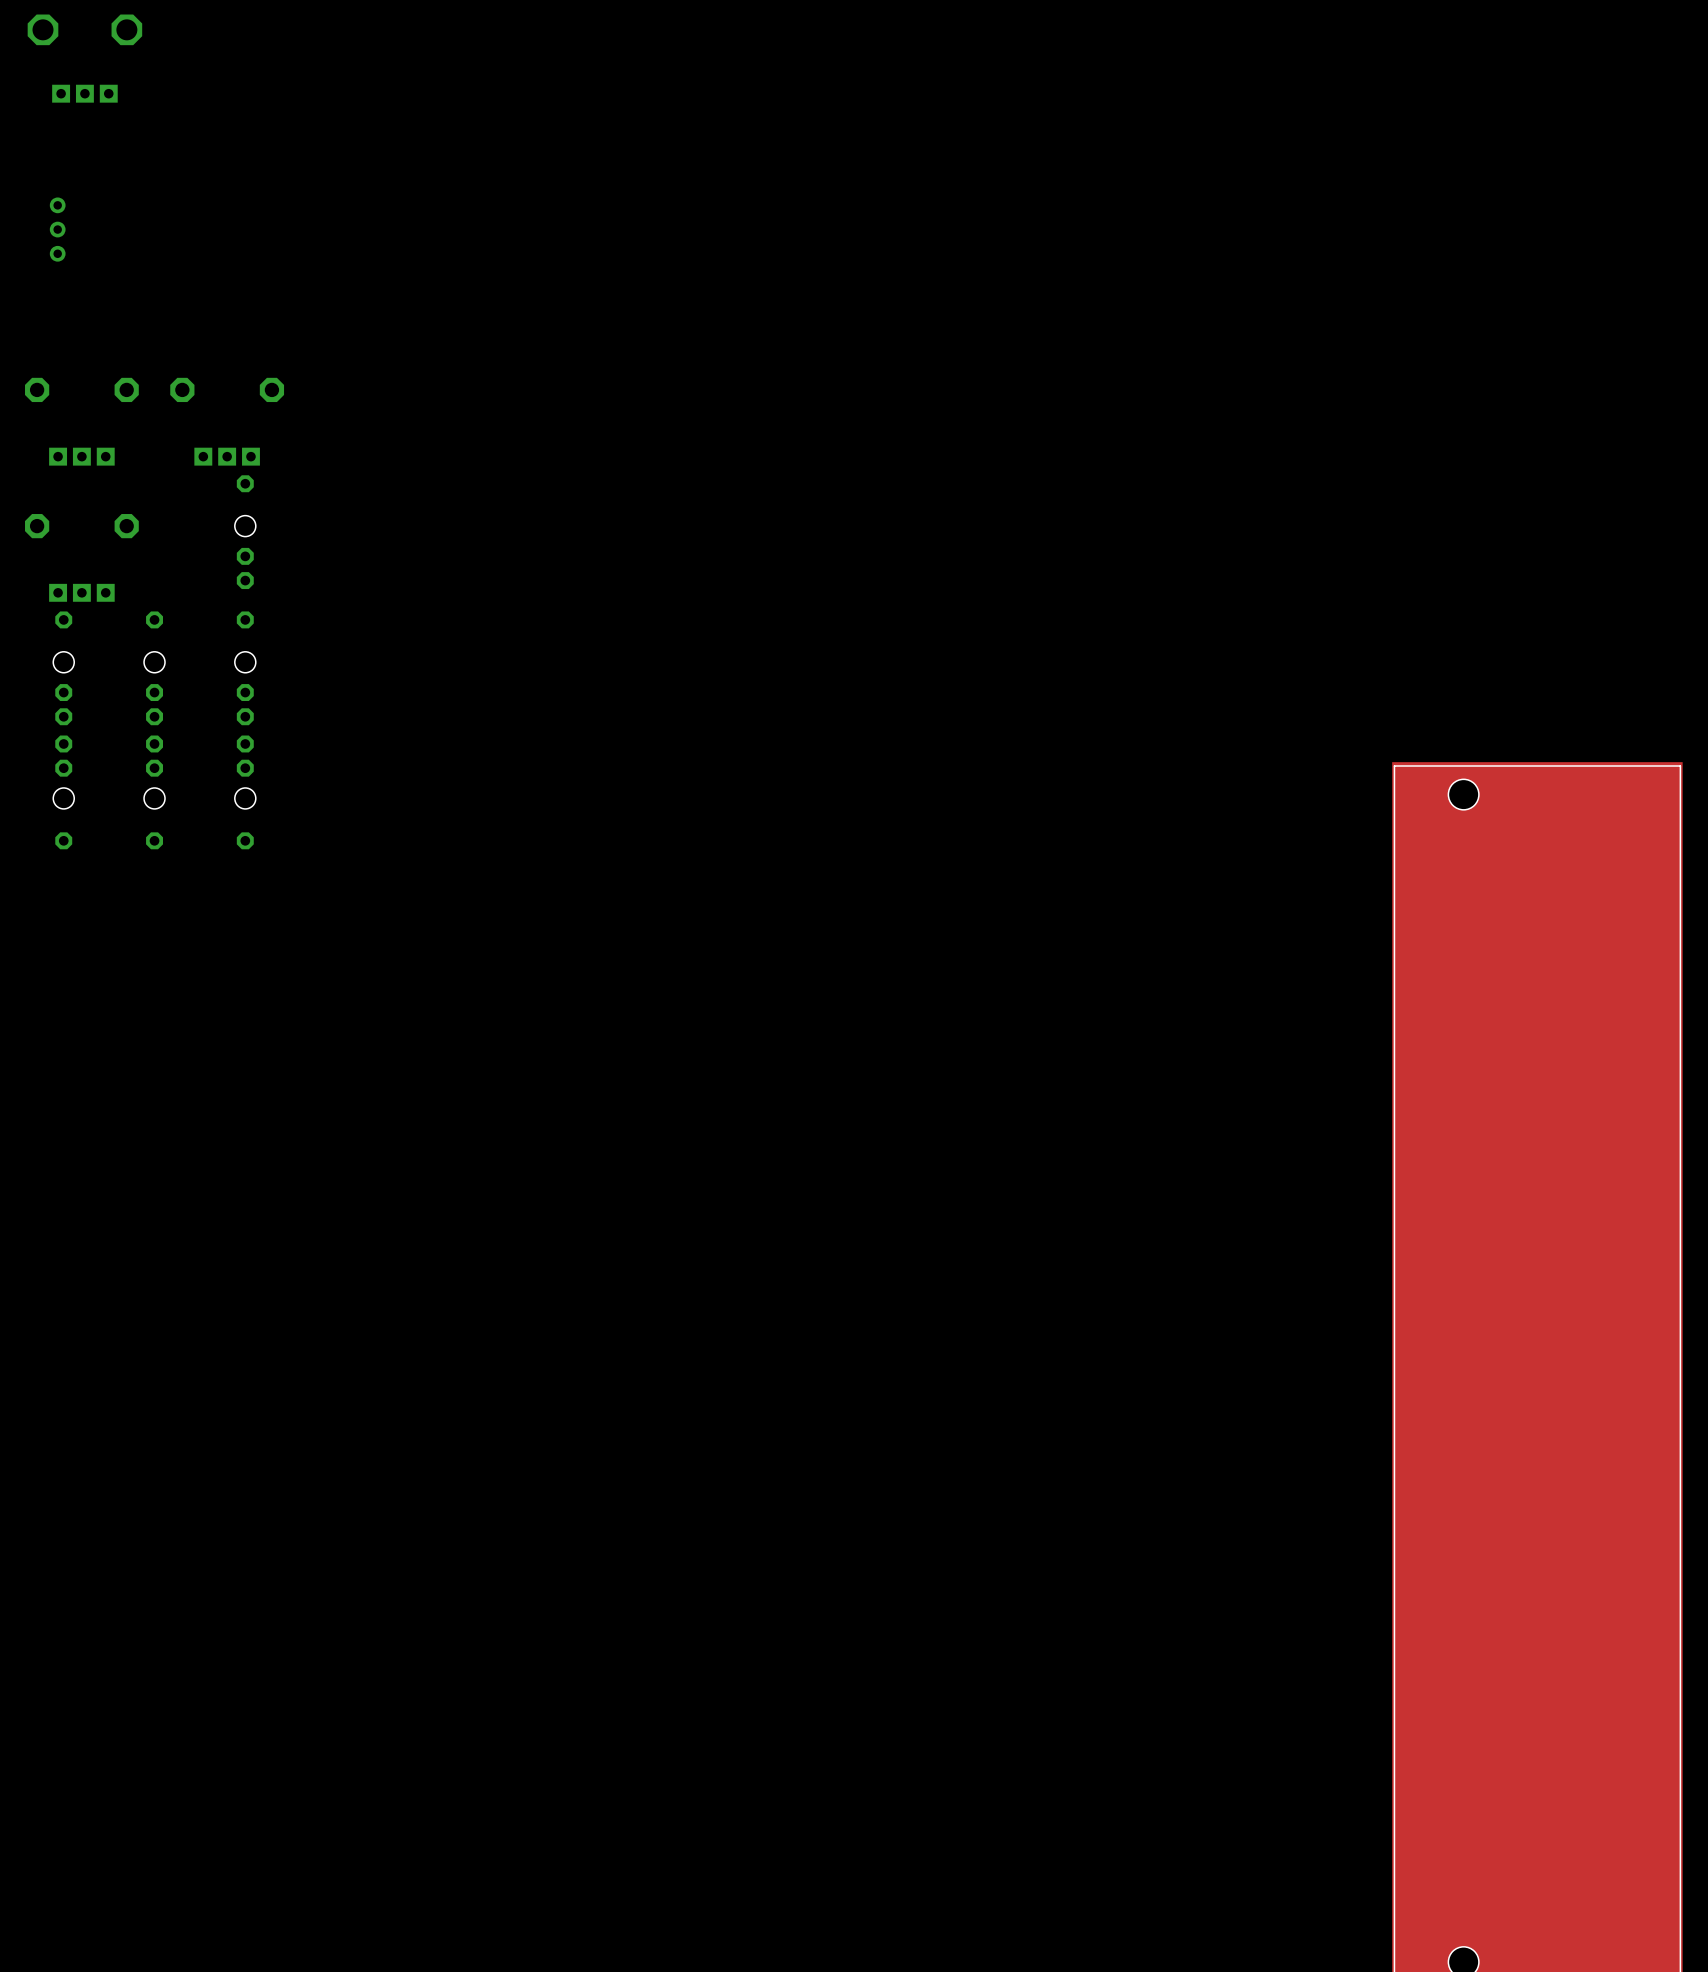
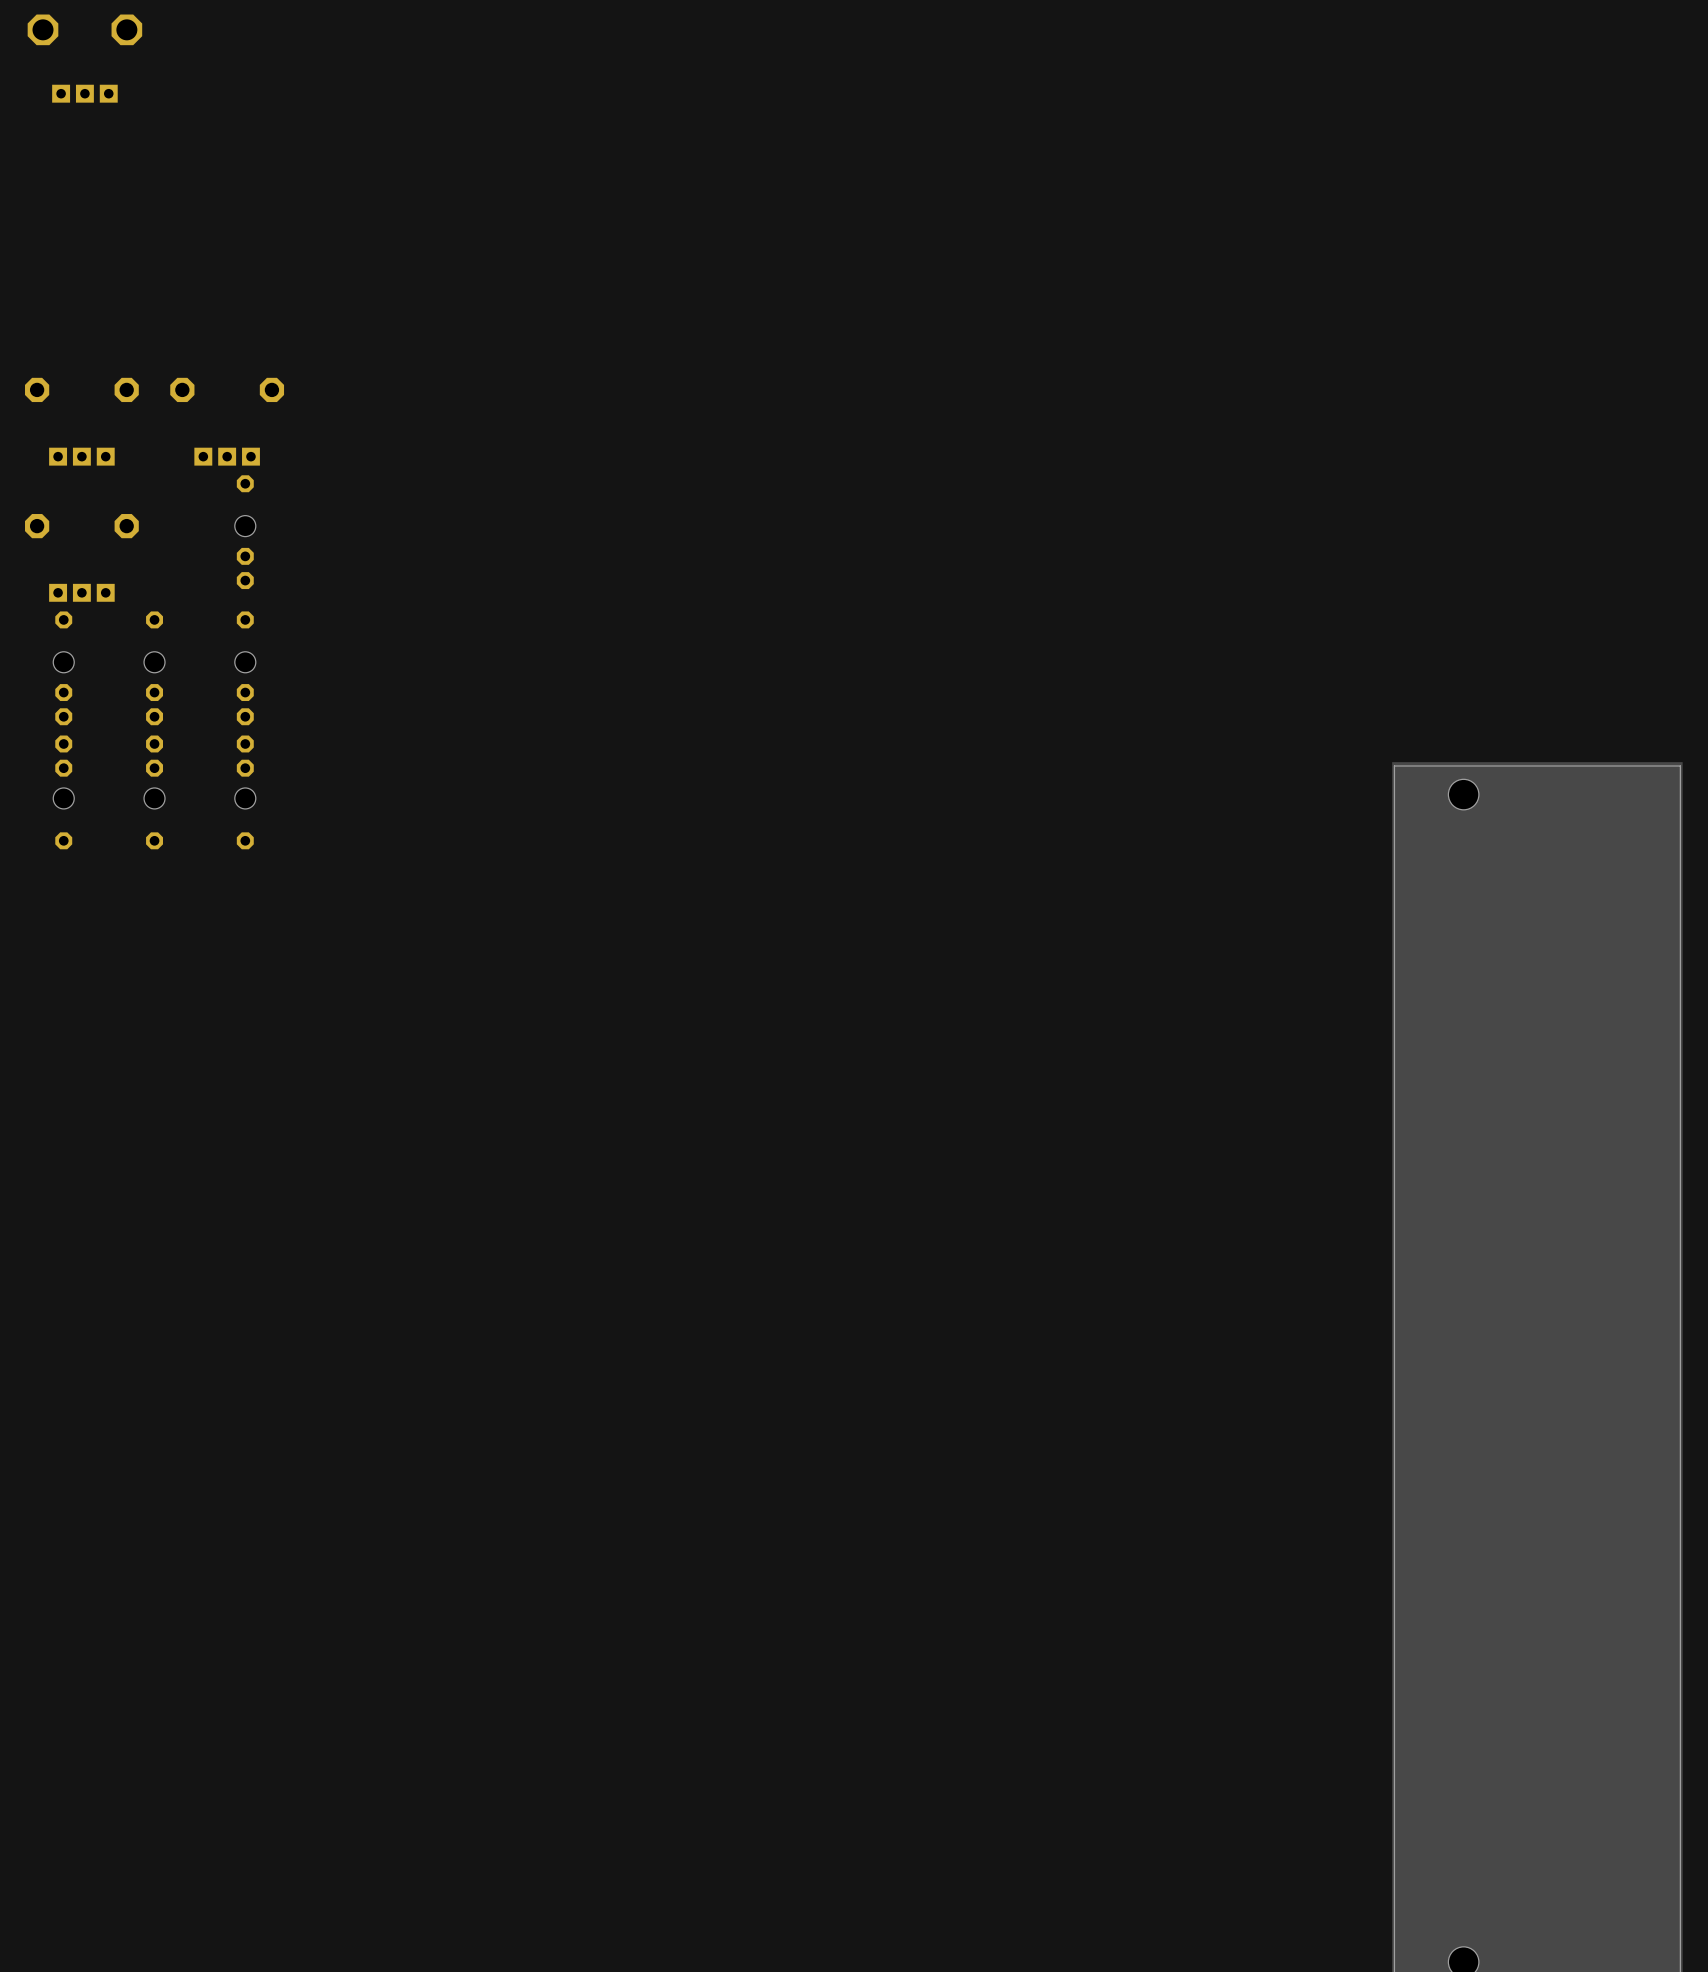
part: (57, 229) -> none

